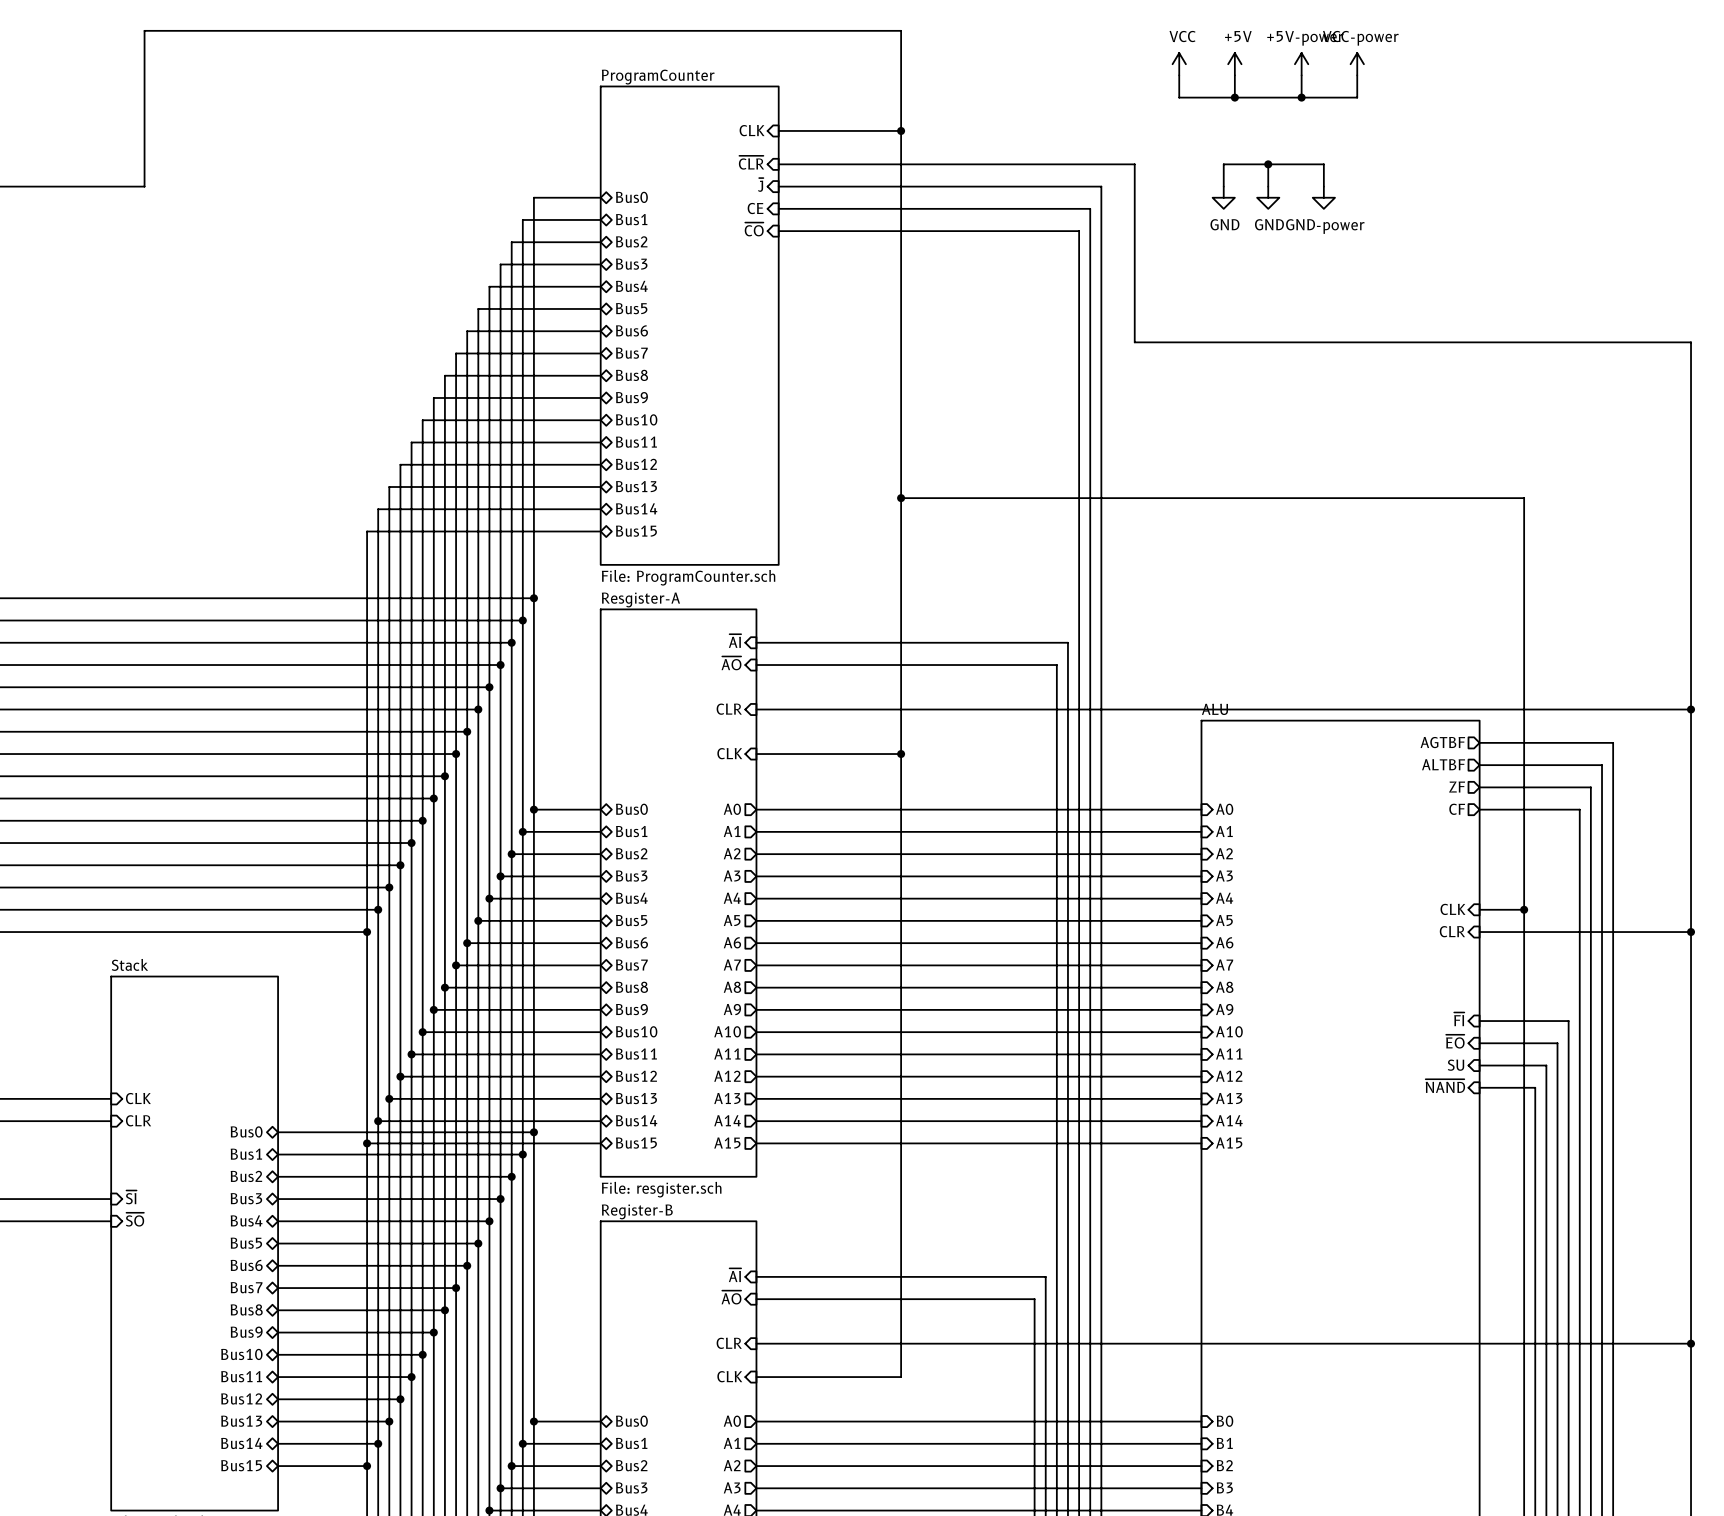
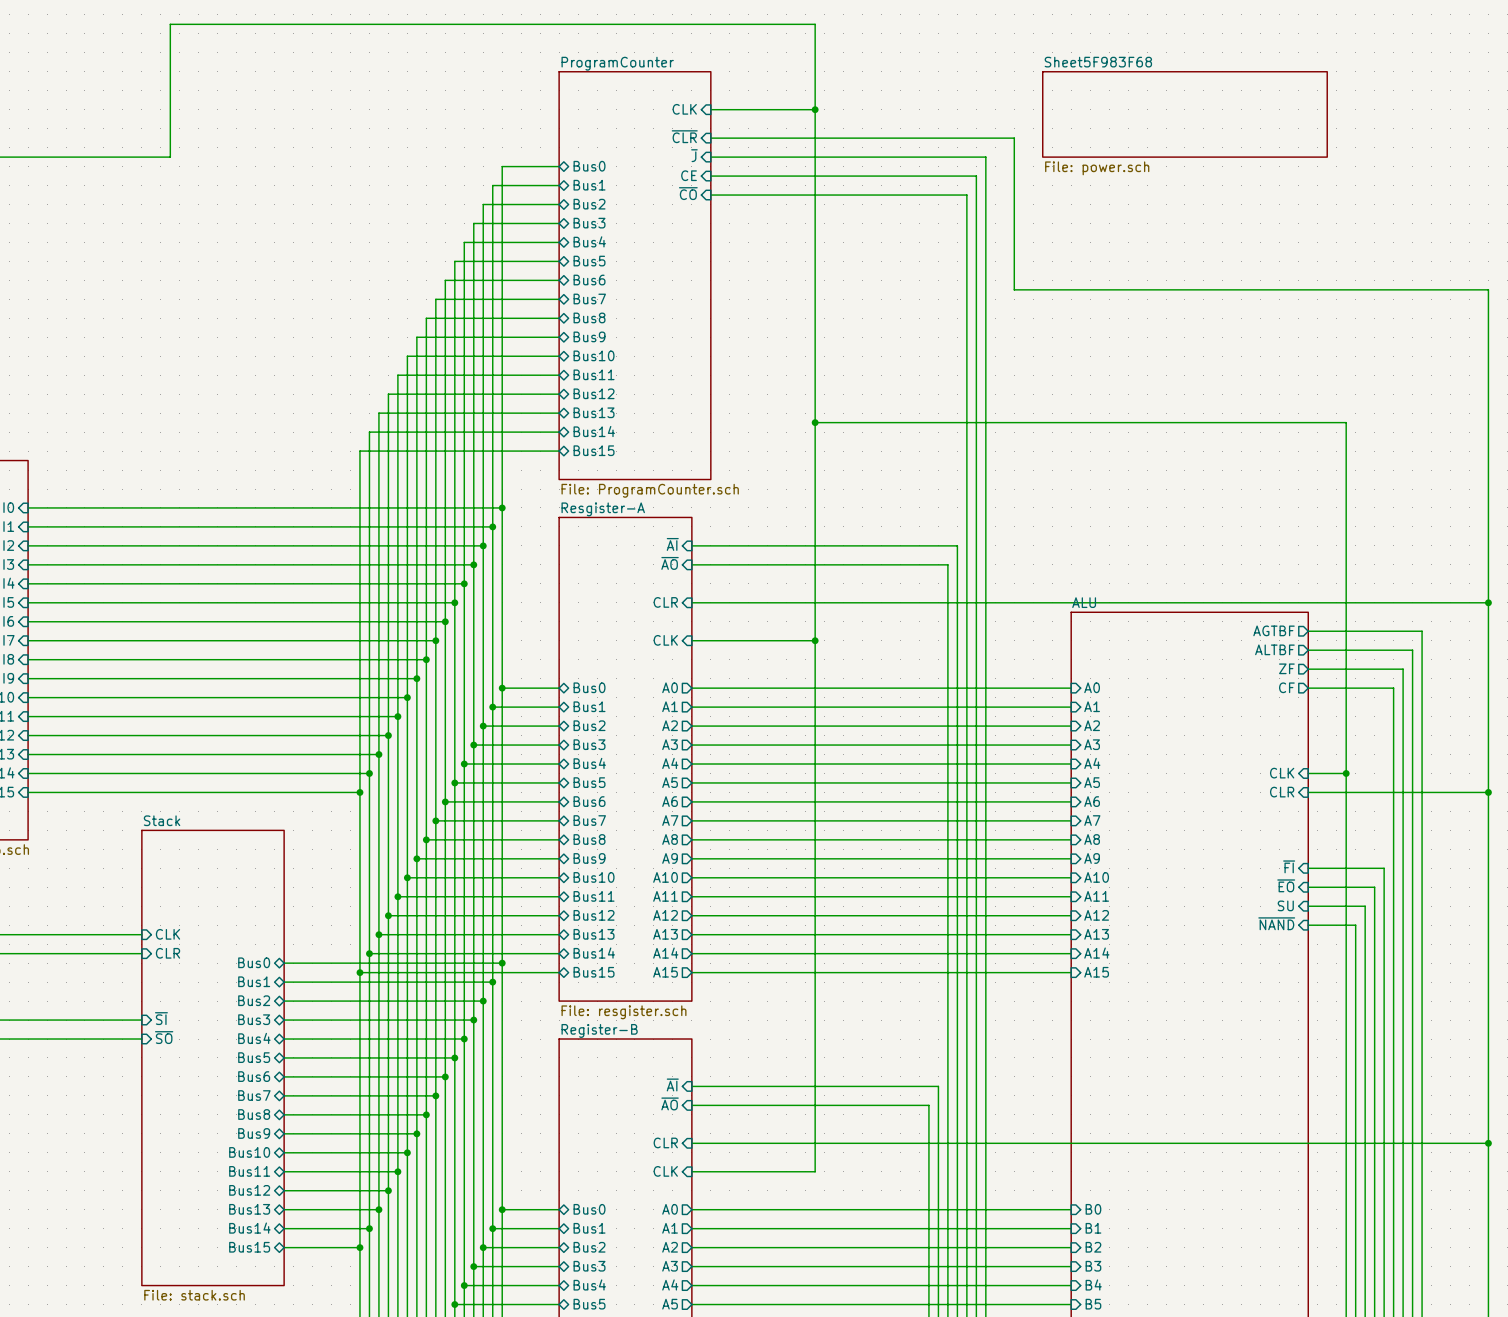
power symbol: VCC (1179, 64) -> none
power symbol: +5V (1234, 64) -> none
power symbol: +5V-power (1301, 64) -> none
power symbol: VCC-power (1357, 64) -> none
wire: (1179, 75) (1179, 97) (1357, 97) (1357, 75) -> none
wire: (1234, 75) (1234, 97) -> none
wire: (1301, 75) (1301, 97) -> none
junction: (1234, 97) -> none
junction: (1301, 97) -> none
sheet Sheet5F983F68: none -> File: power.sch (1184, 114)
wire: (1268, 164) (1268, 186) -> none
junction: (1268, 164) -> none
wire: (1223, 186) (1223, 164) (1323, 164) (1323, 186) -> none
power symbol: GND (1223, 197) -> none
power symbol: GND (1268, 197) -> none
power symbol: GND-power (1323, 197) -> none

